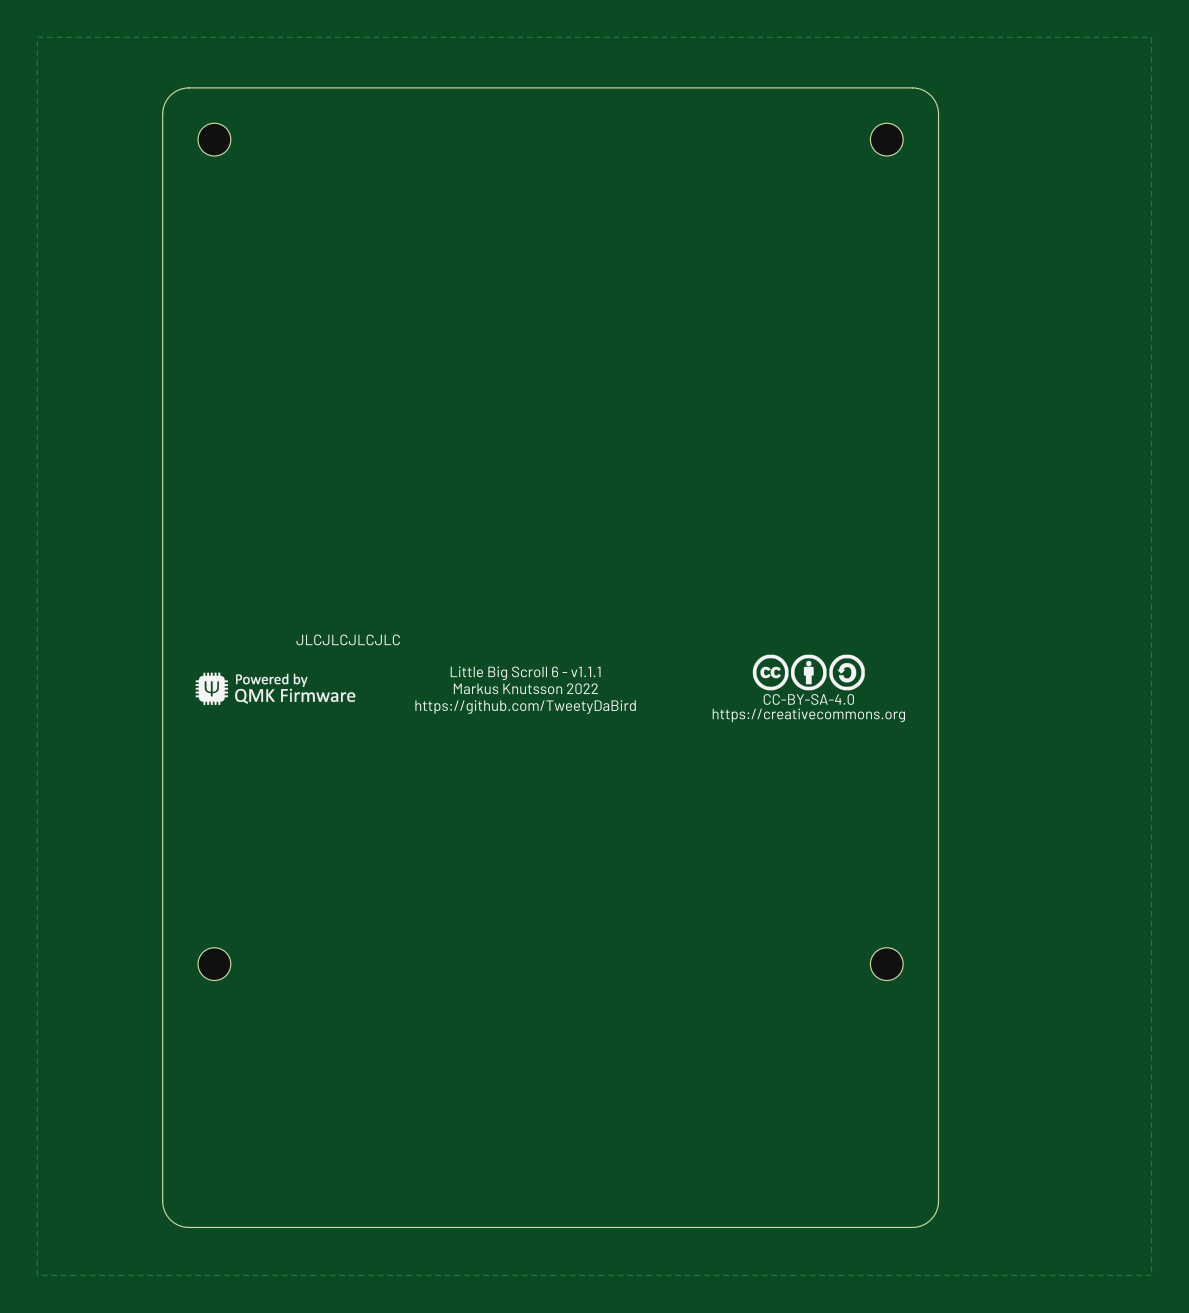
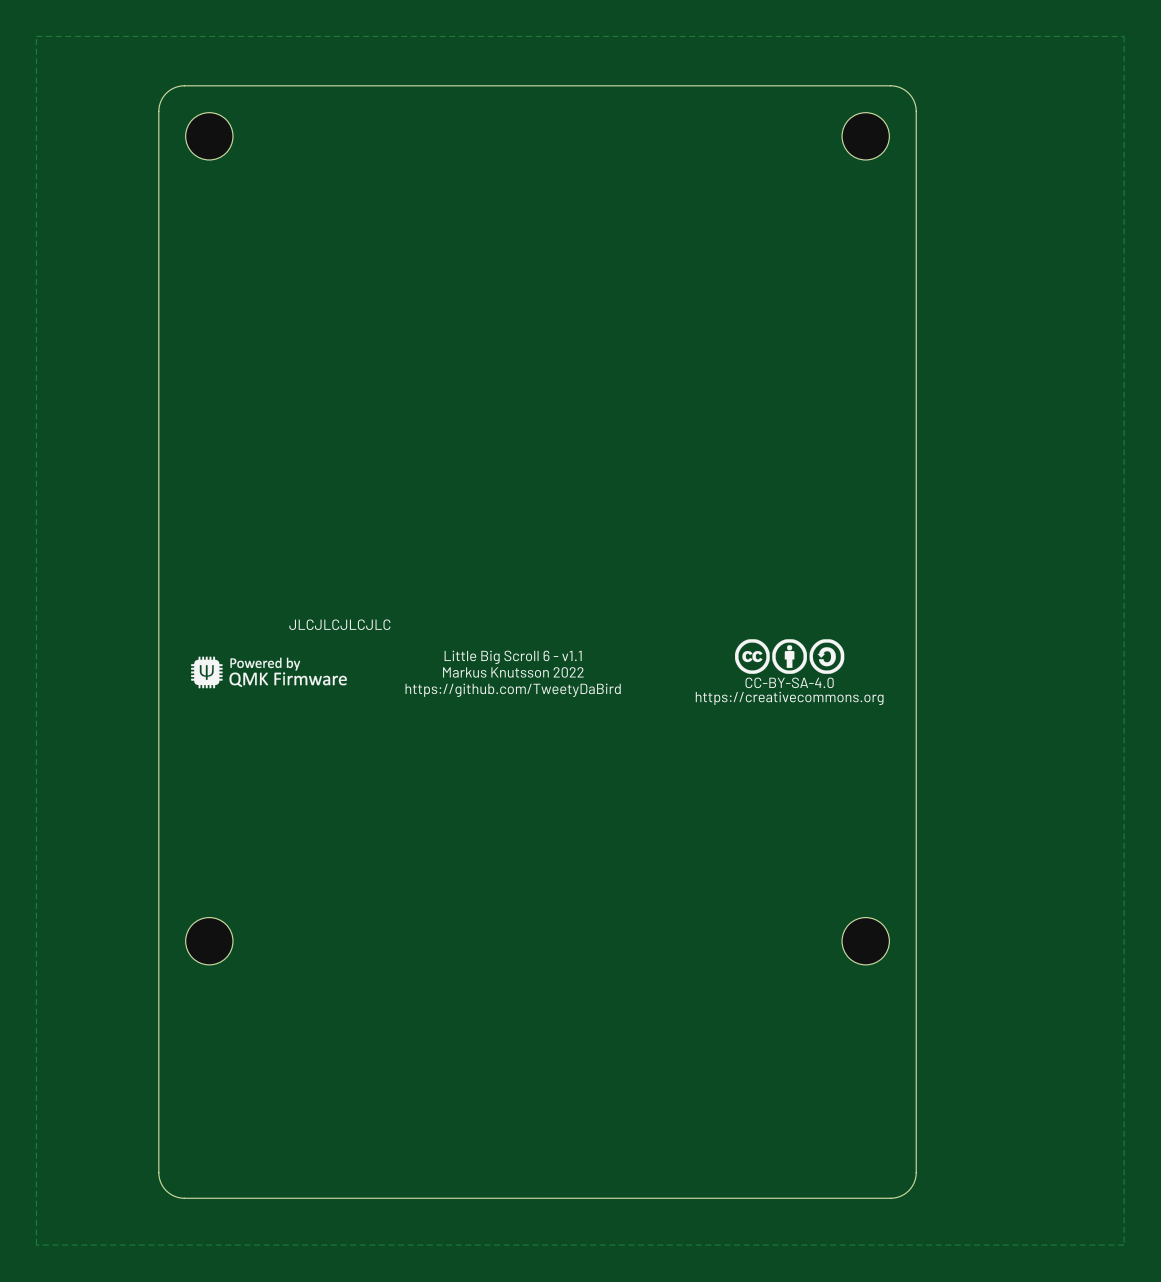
part footprint: [198, 123, 231, 157] -> [185, 112, 233, 160]
part footprint: [870, 123, 904, 157] -> [842, 112, 890, 160]
text: Little Big Scroll 6 - v1.1.1 (525, 673) -> Little Big Scroll 6 - v1.1 (513, 657)
part footprint: [198, 947, 231, 981] -> [185, 917, 233, 965]
part footprint: [870, 947, 904, 981] -> [842, 917, 890, 965]

